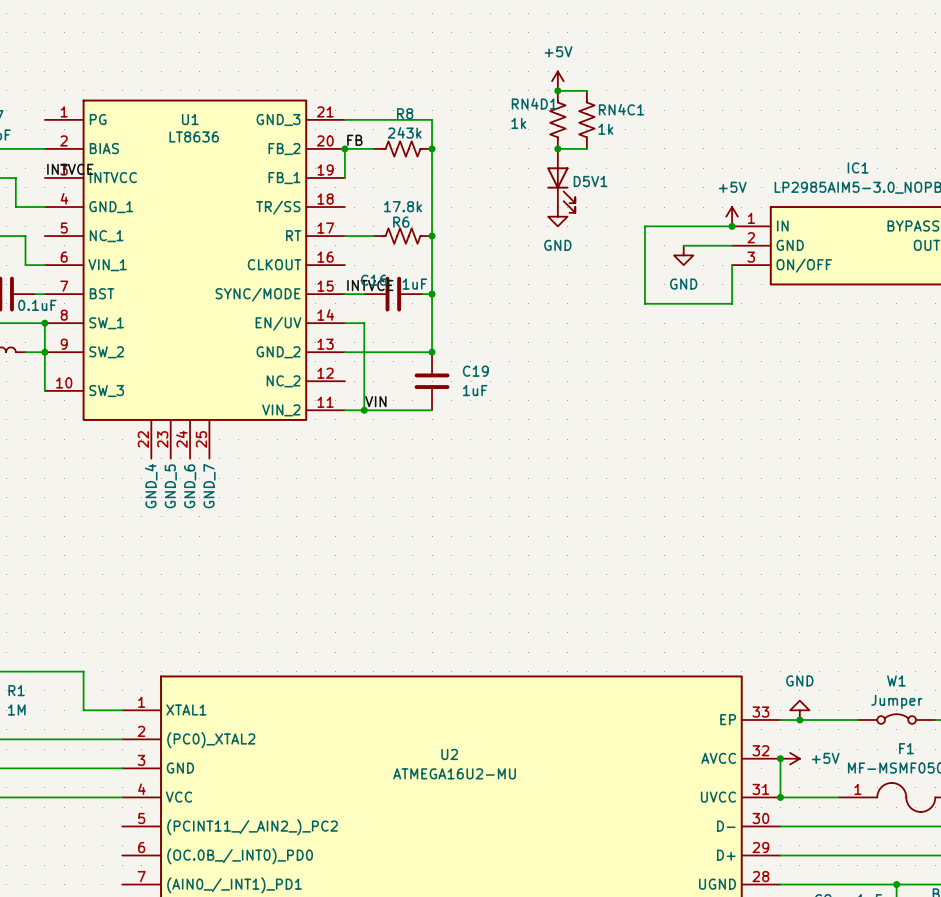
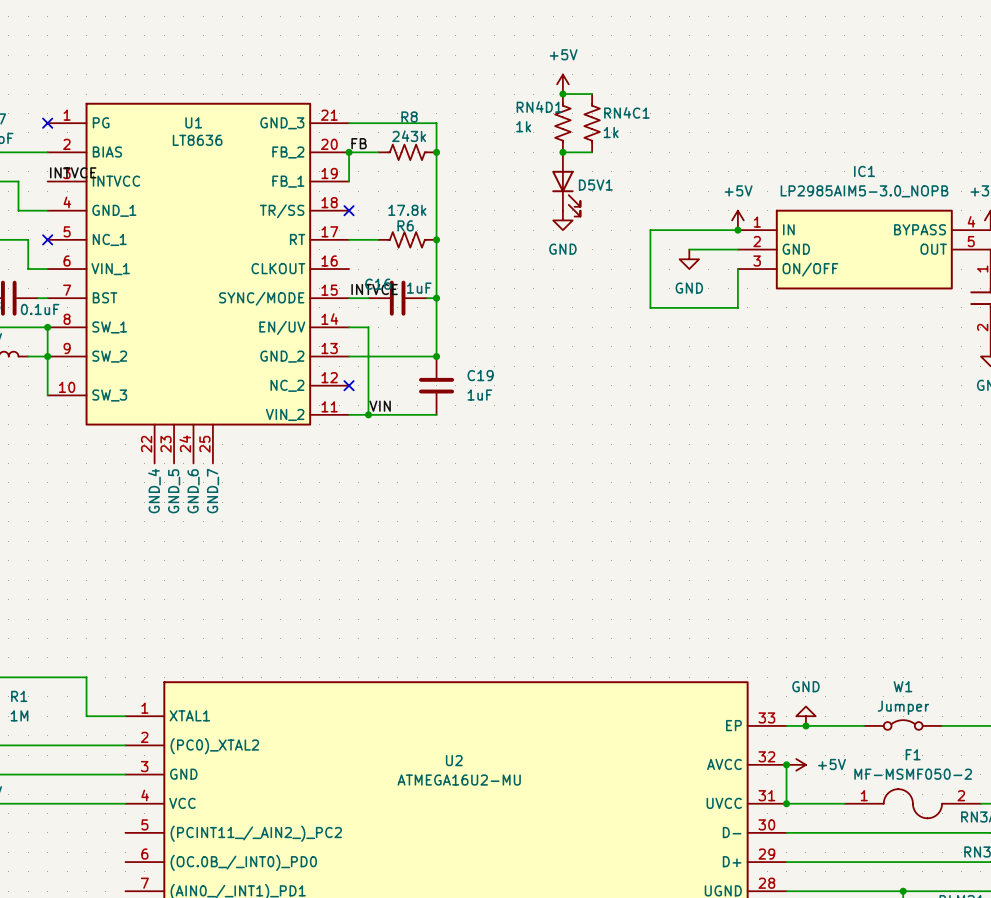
no-connect mark: none -> (47, 123)
no-connect mark: none -> (349, 210)
no-connect mark: none -> (47, 239)
no-connect mark: none -> (349, 385)

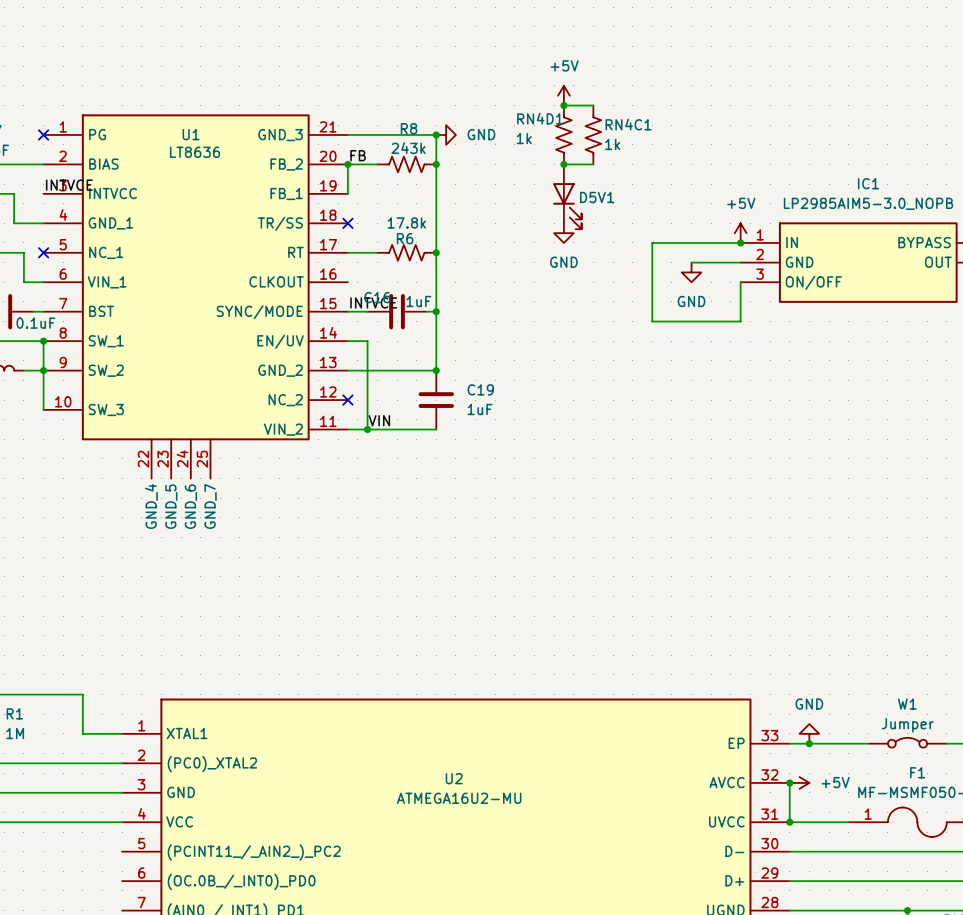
junction: none -> (436, 134)
power symbol: none -> GND (446, 134)

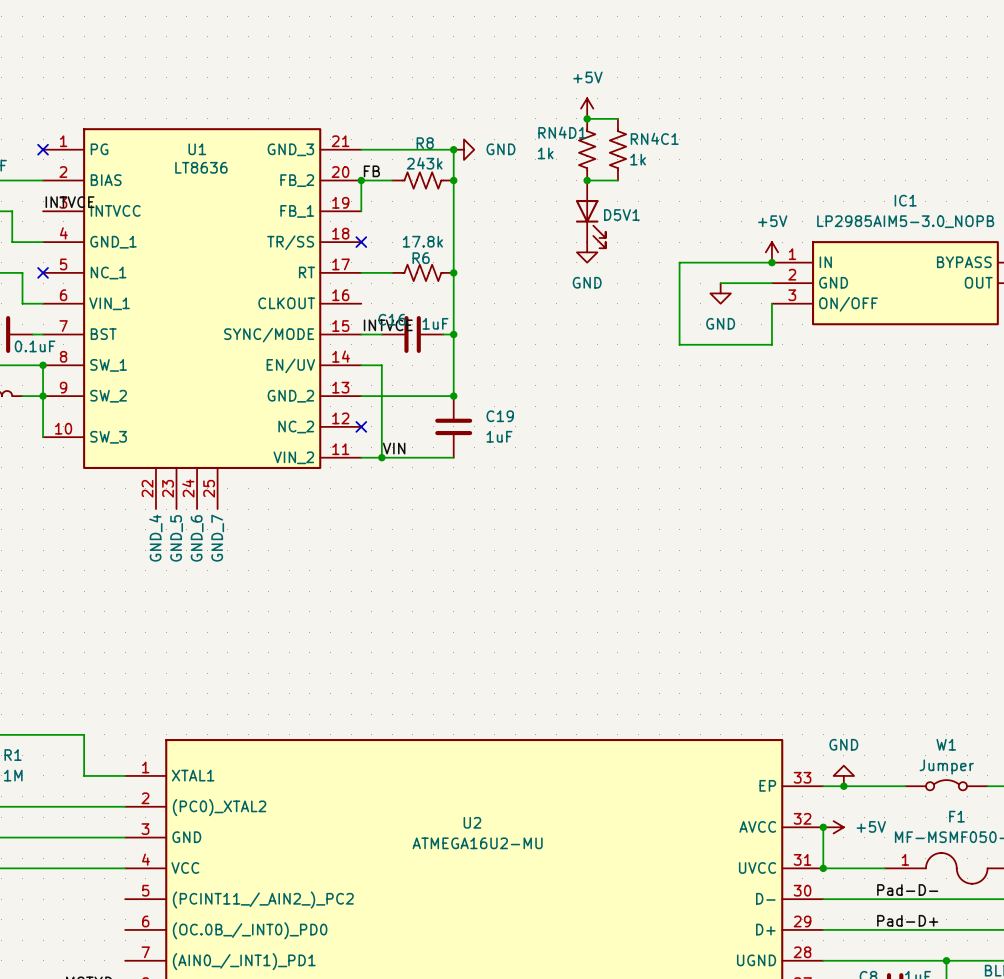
label: none -> Pad-D- (907, 890)
label: none -> Pad-D+ (907, 920)

